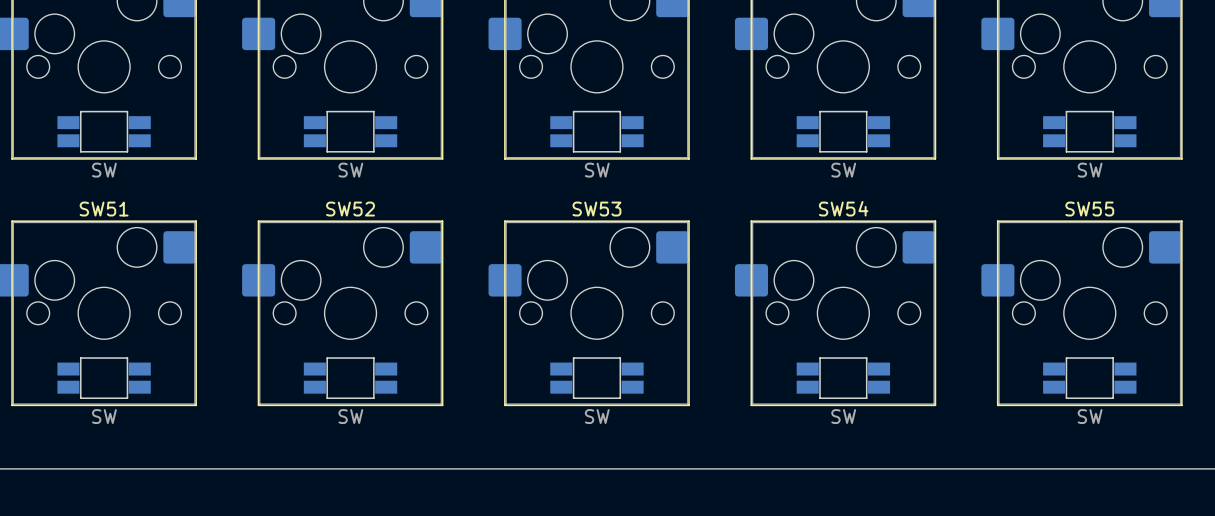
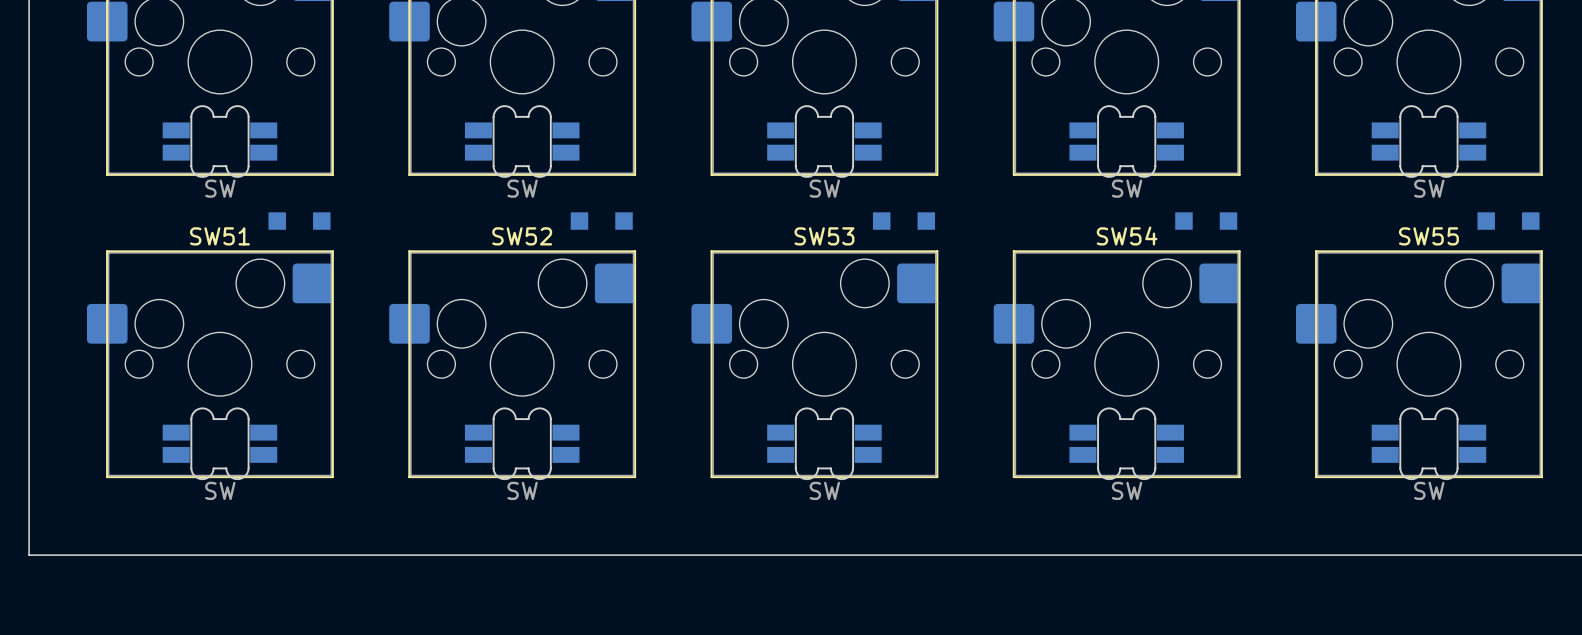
part footprint: [57, 110, 151, 153] -> [162, 105, 278, 178]
part footprint: [303, 110, 398, 153] -> [464, 105, 580, 178]
part footprint: [550, 110, 644, 153] -> [767, 105, 882, 178]
part footprint: [796, 110, 891, 153] -> [1069, 105, 1184, 178]
part footprint: [1043, 110, 1137, 153] -> [1371, 105, 1487, 178]
part: none -> (299, 221)
part: none -> (601, 221)
part: none -> (903, 221)
part: none -> (1206, 221)
part: none -> (1508, 221)
part footprint: [57, 357, 151, 400] -> [162, 407, 278, 481]
part footprint: [303, 357, 398, 400] -> [464, 407, 580, 481]
part footprint: [550, 357, 644, 400] -> [767, 407, 882, 481]
part footprint: [796, 357, 891, 400] -> [1069, 407, 1184, 481]
part footprint: [1043, 357, 1137, 400] -> [1371, 407, 1487, 481]

